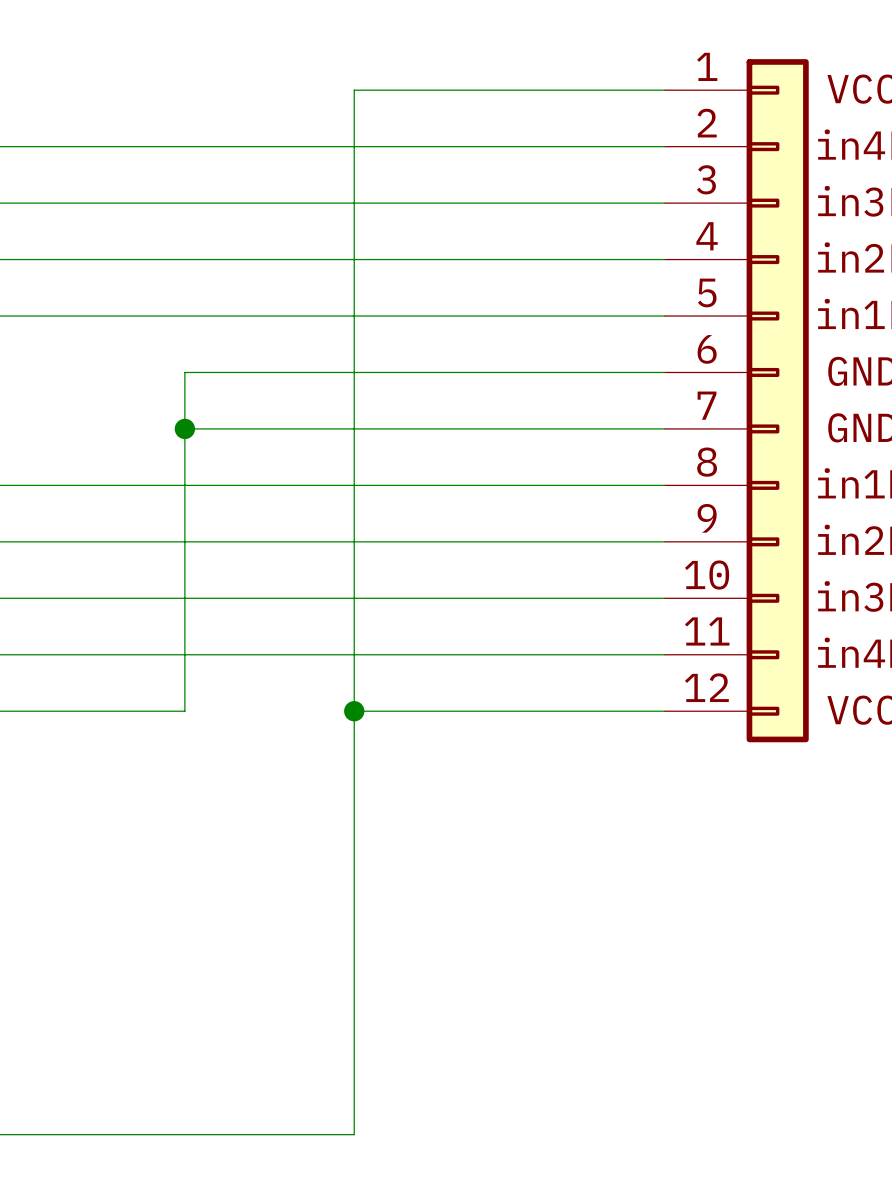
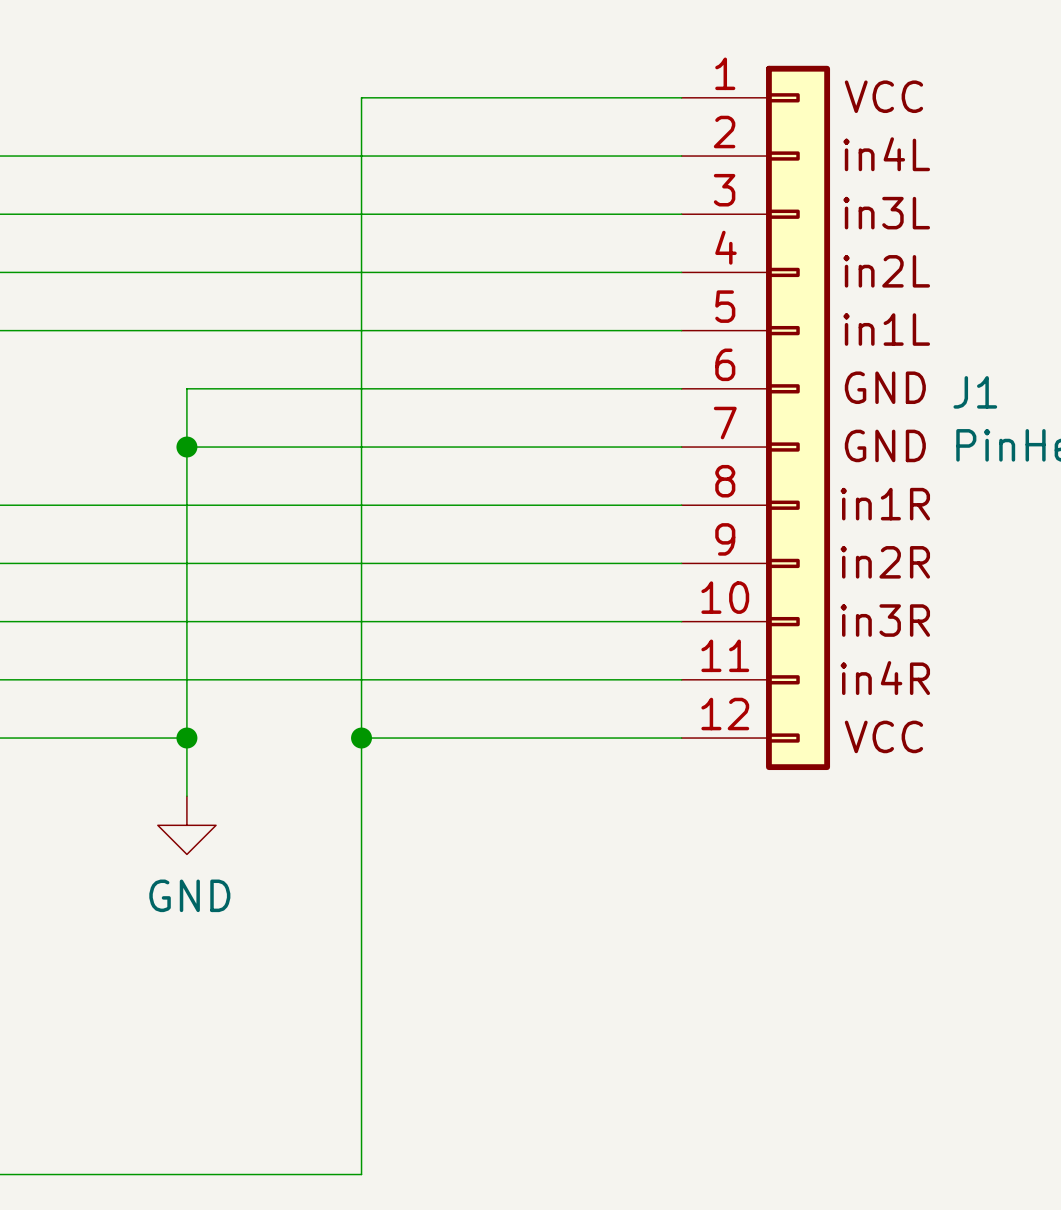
wire: none -> (186, 738) (186, 796)
junction: none -> (186, 738)
power symbol: none -> GND (186, 825)

